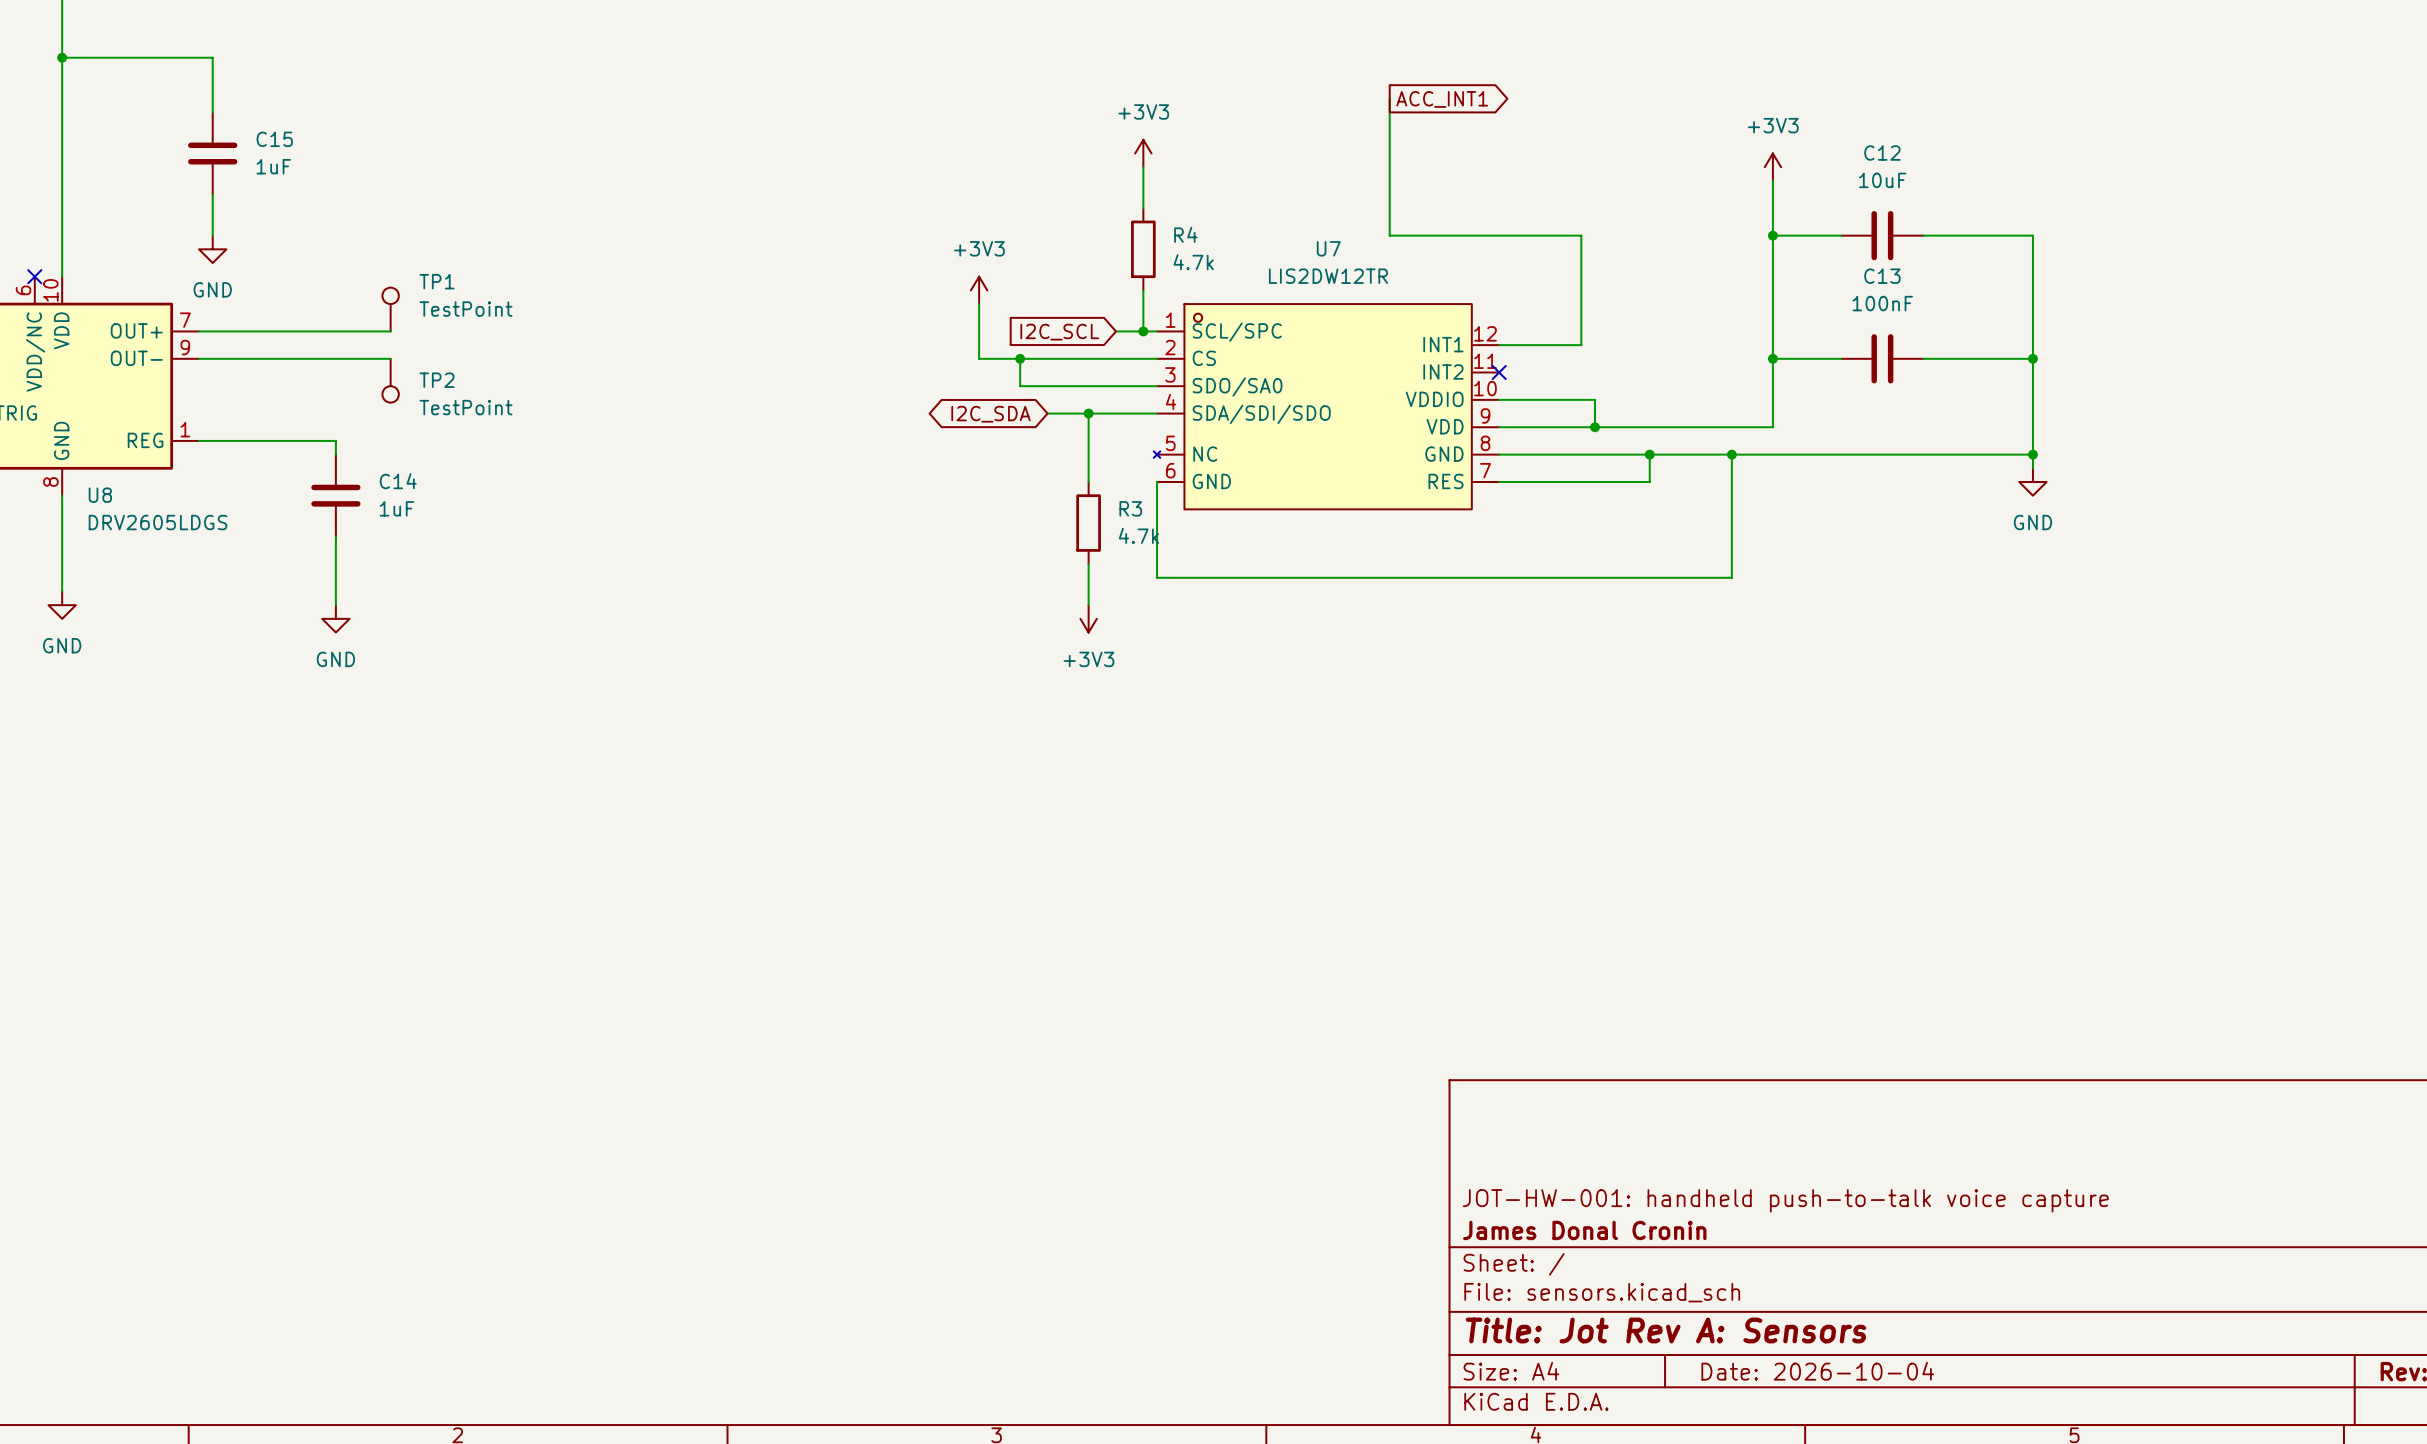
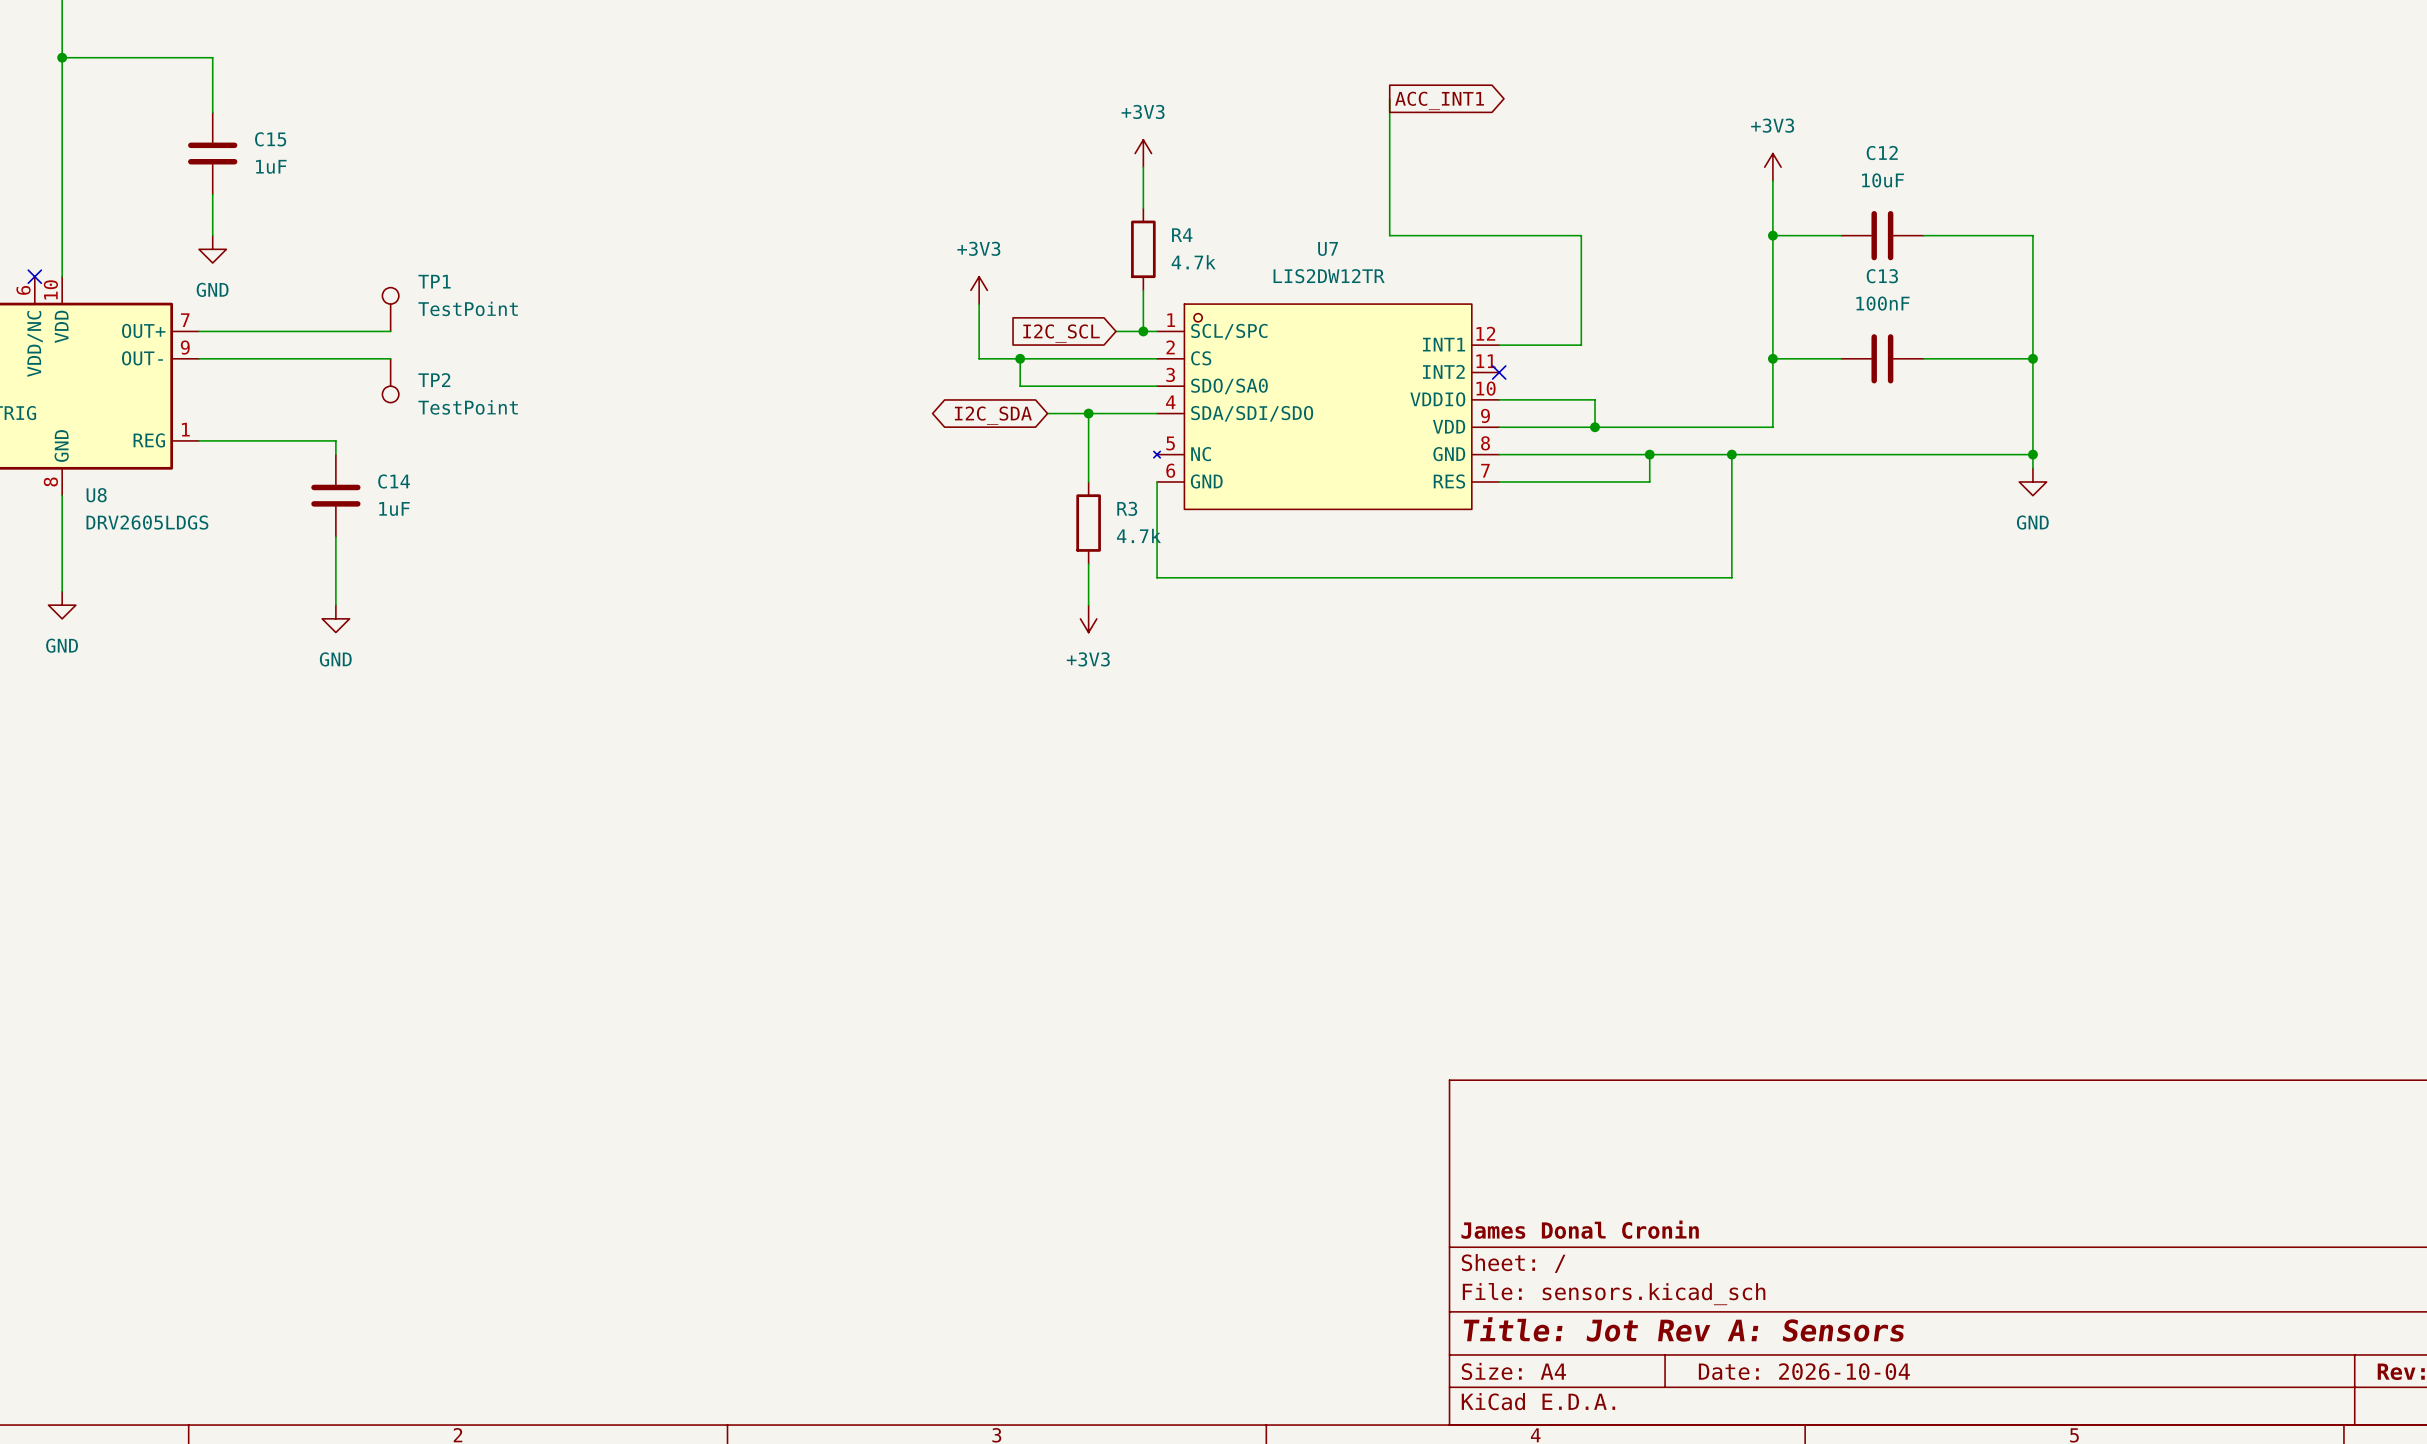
title block: JOT-HW-001: handheld push-to-talk voice capture (1785, 1200) -> none

